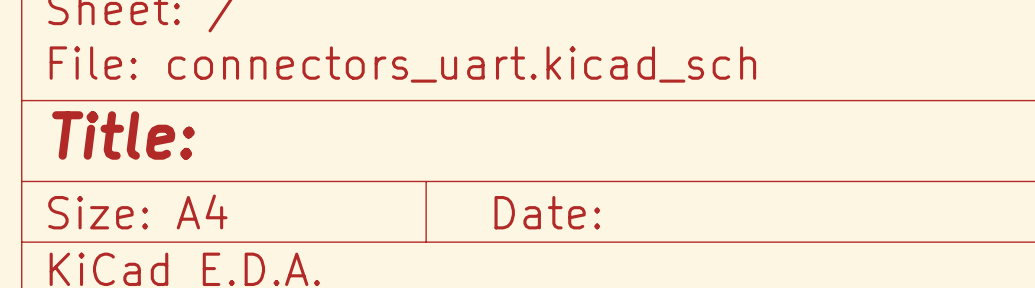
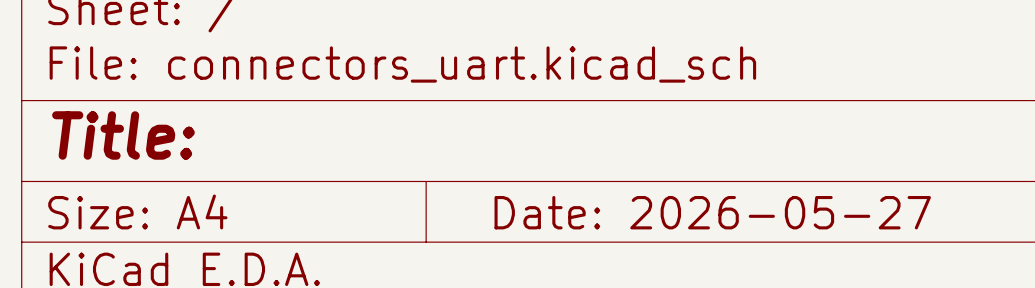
title block: Date: (547, 212) -> Date: 2026-05-27 (712, 212)

